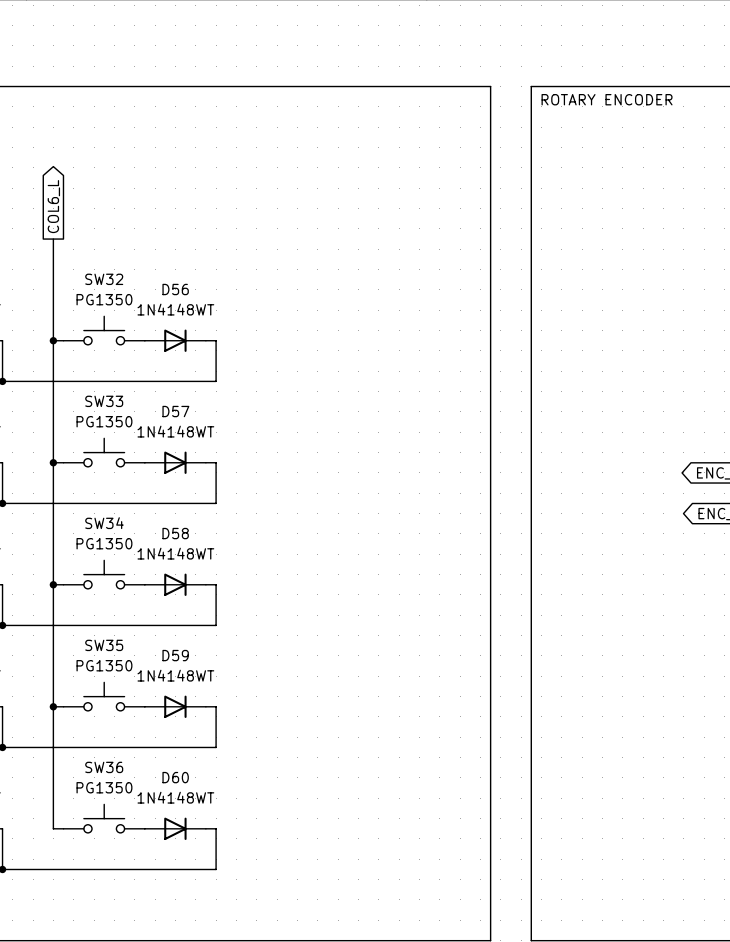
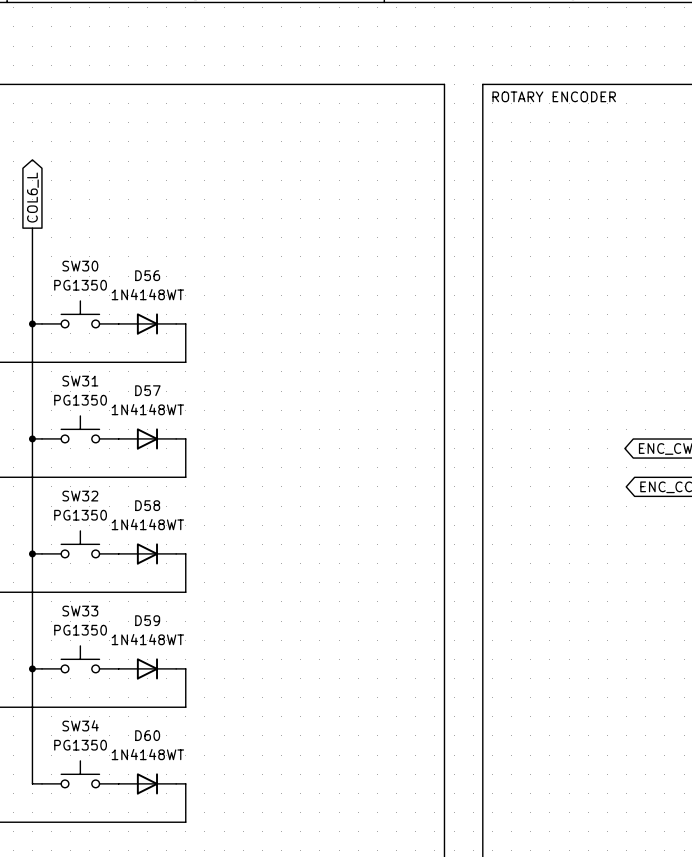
SW32 name: SW32 (104, 279) -> SW30 (80, 266)
SW33 name: SW33 (104, 401) -> SW31 (80, 381)
SW34 name: SW34 (104, 523) -> SW32 (80, 496)
SW35 name: SW35 (104, 645) -> SW33 (80, 611)
SW36 name: SW36 (104, 767) -> SW34 (80, 725)

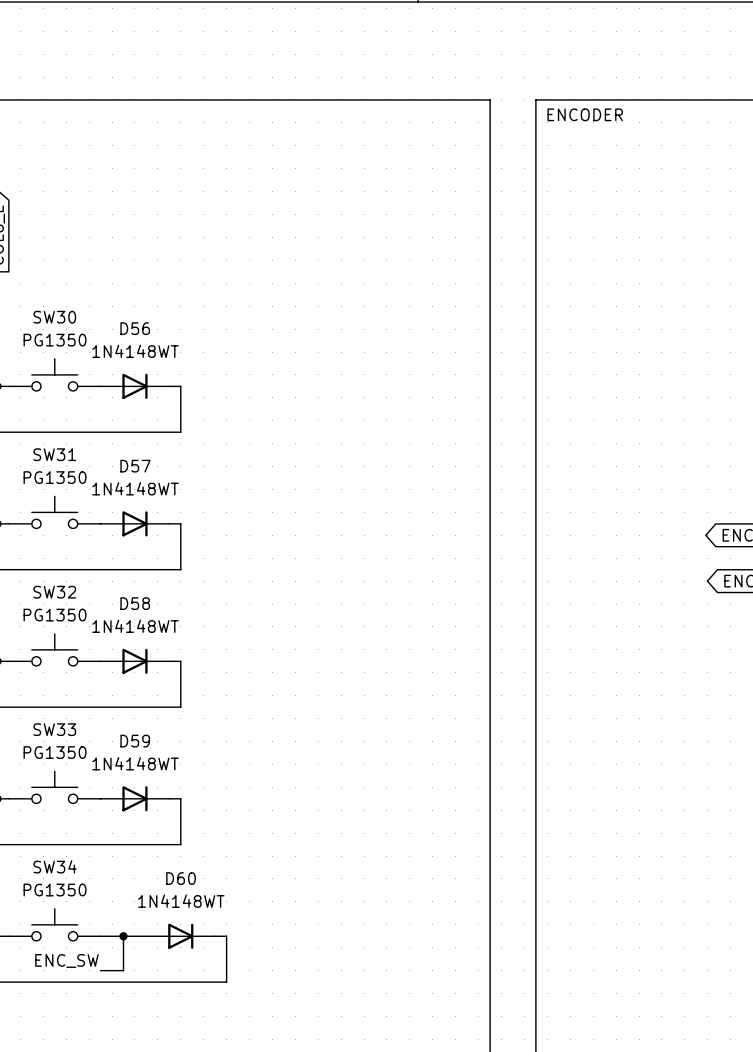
text: ROTARY ENCODER (554, 96) -> ENCODER (585, 114)
wire: none -> (123, 936) (123, 970) (100, 970)
junction: none -> (123, 936)
D60 position: (147, 783) -> (180, 936)
wire: (176, 783) (185, 783) (185, 822) -> (215, 936) (226, 936) (226, 982) (180, 982)
label: none -> ENC_SW (66, 960)

